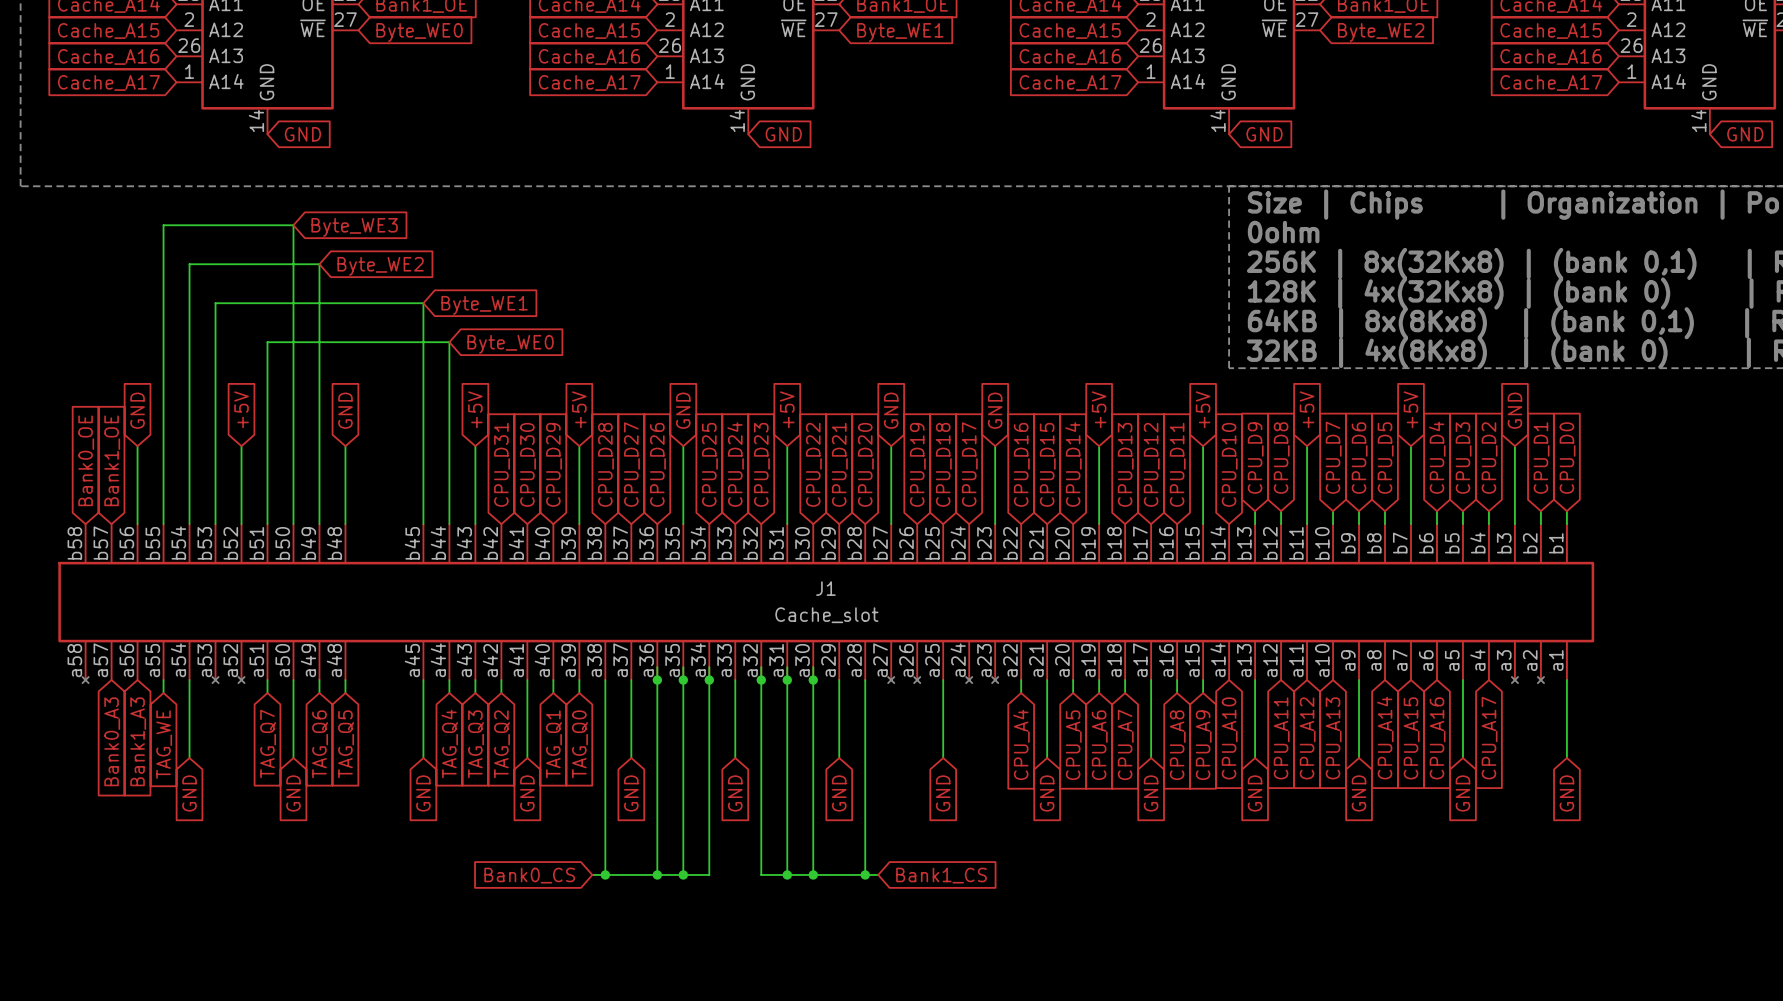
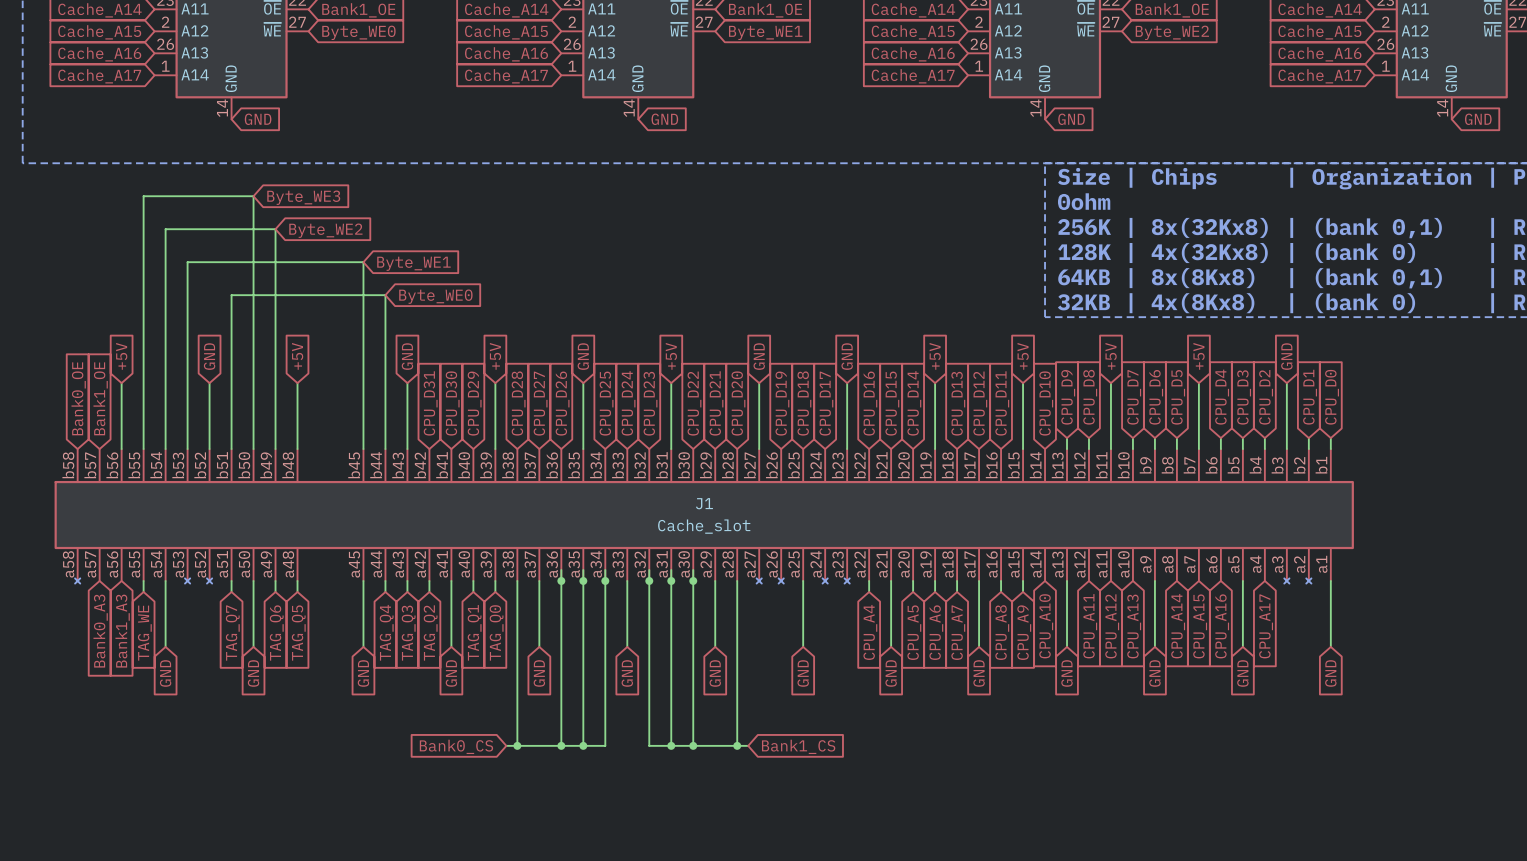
global label: +5V (241, 409) -> GND (209, 356)
global label: +5V (475, 409) -> GND (407, 356)
global label: GND (137, 410) -> +5V (121, 356)
global label: GND (345, 410) -> +5V (297, 356)

